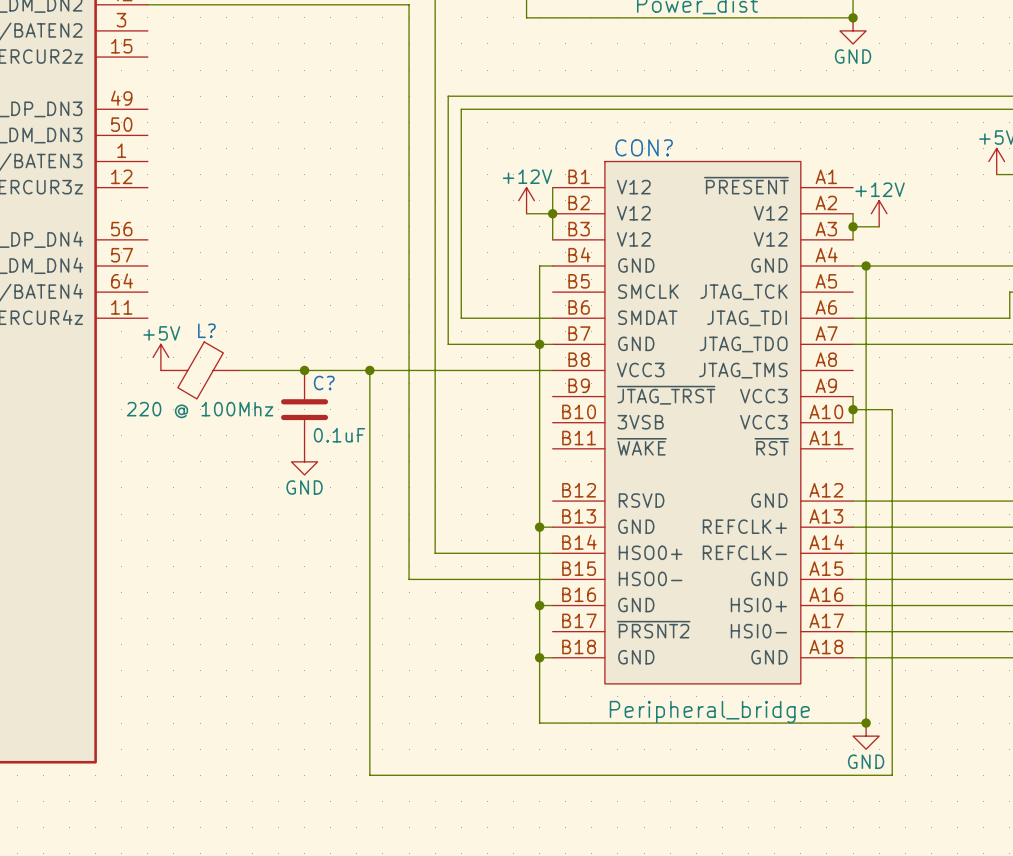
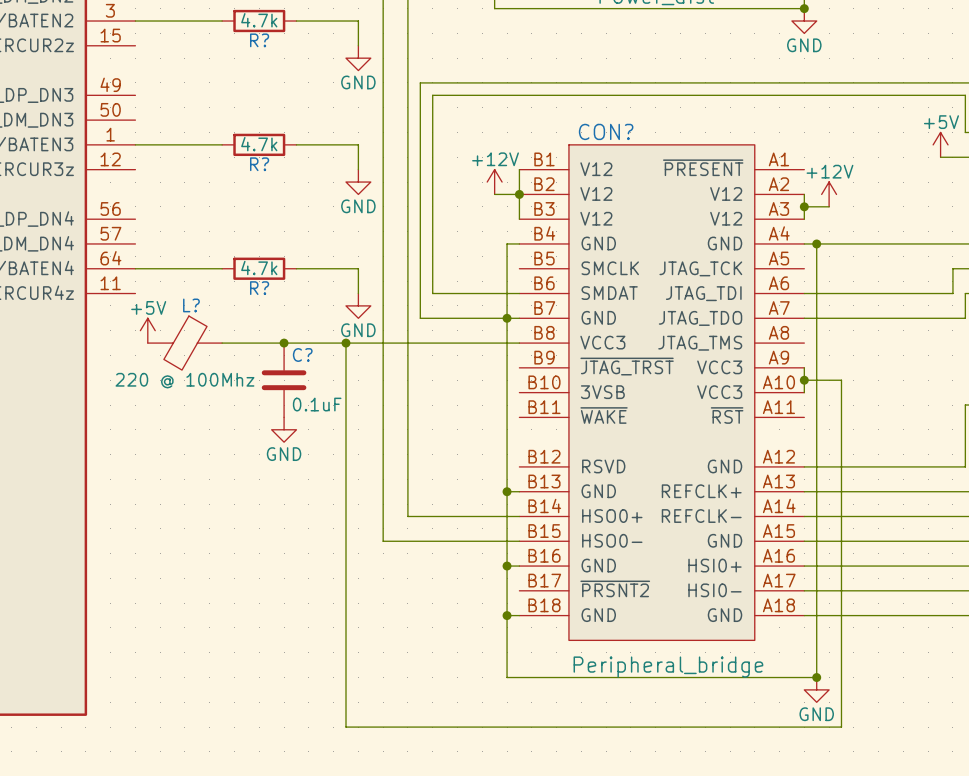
wire: none -> (135, 21) (222, 21)
R?: none -> 4.7k (259, 21)
wire: none -> (296, 21) (358, 21) (358, 45)
power symbol: none -> GND (358, 58)
wire: none -> (135, 144) (222, 144)
R?: none -> 4.7k (259, 144)
wire: none -> (296, 144) (358, 144) (358, 169)
power symbol: none -> GND (358, 182)
wire: none -> (135, 268) (222, 268)
R?: none -> 4.7k (259, 268)
wire: none -> (296, 268) (358, 268) (358, 293)
power symbol: none -> GND (358, 305)

